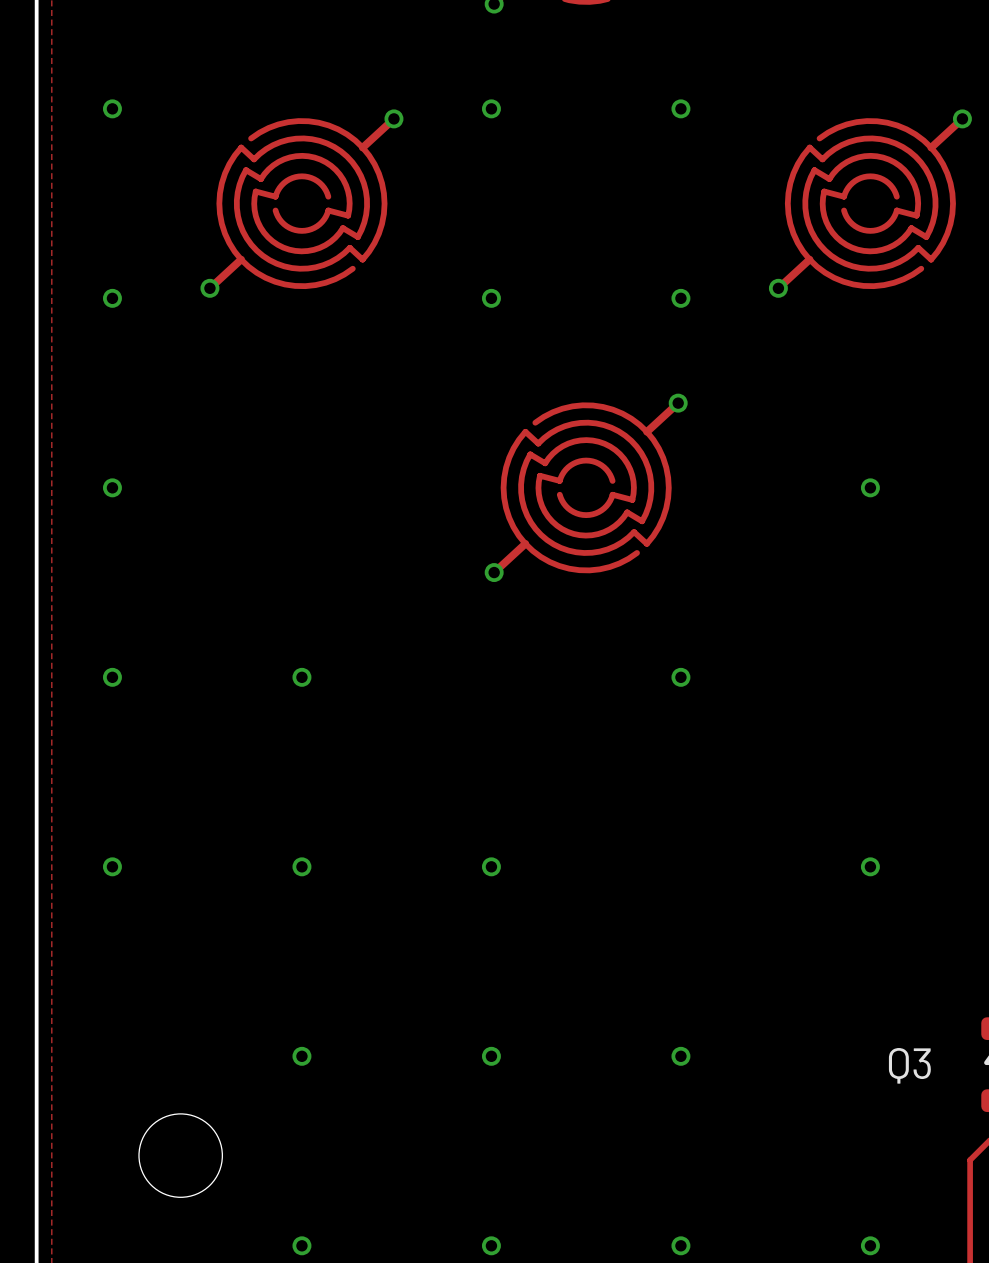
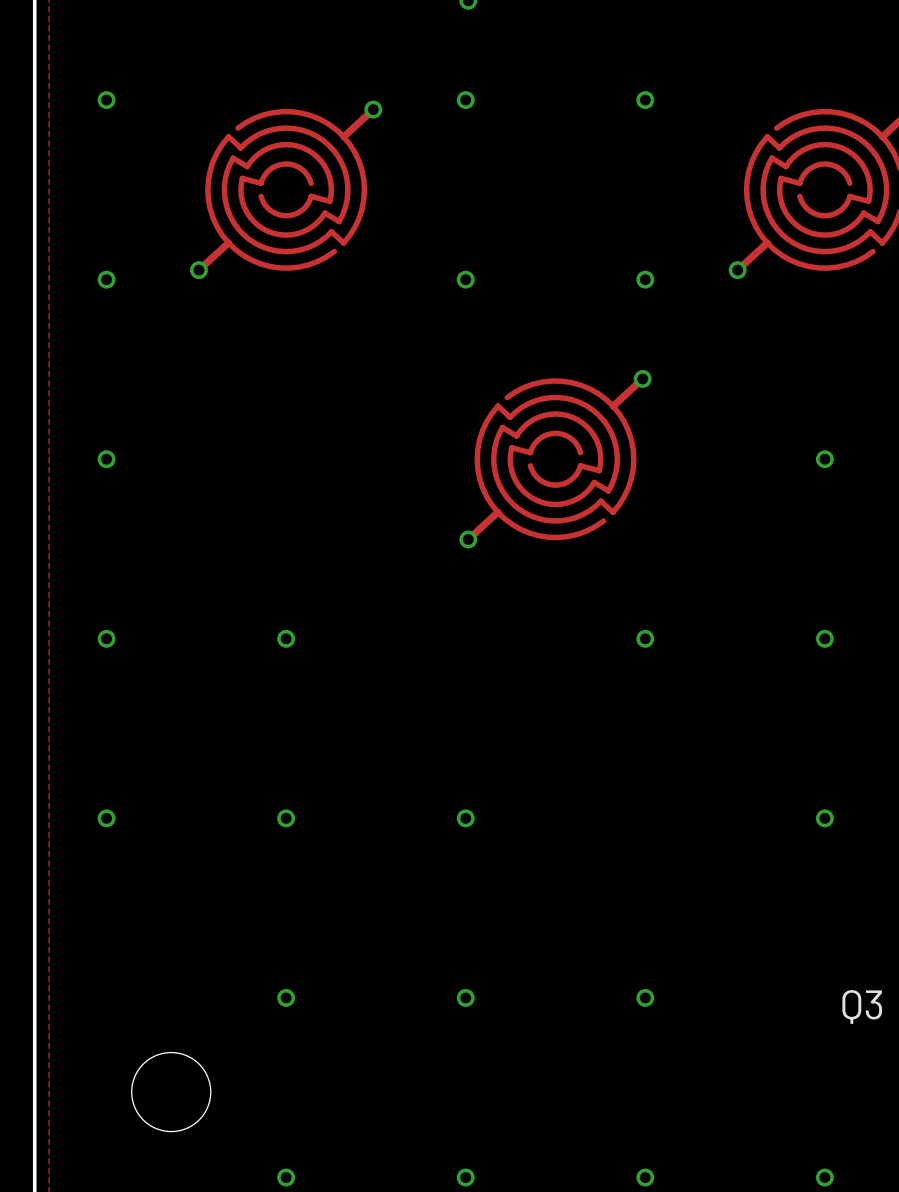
via: none -> (824, 638)

